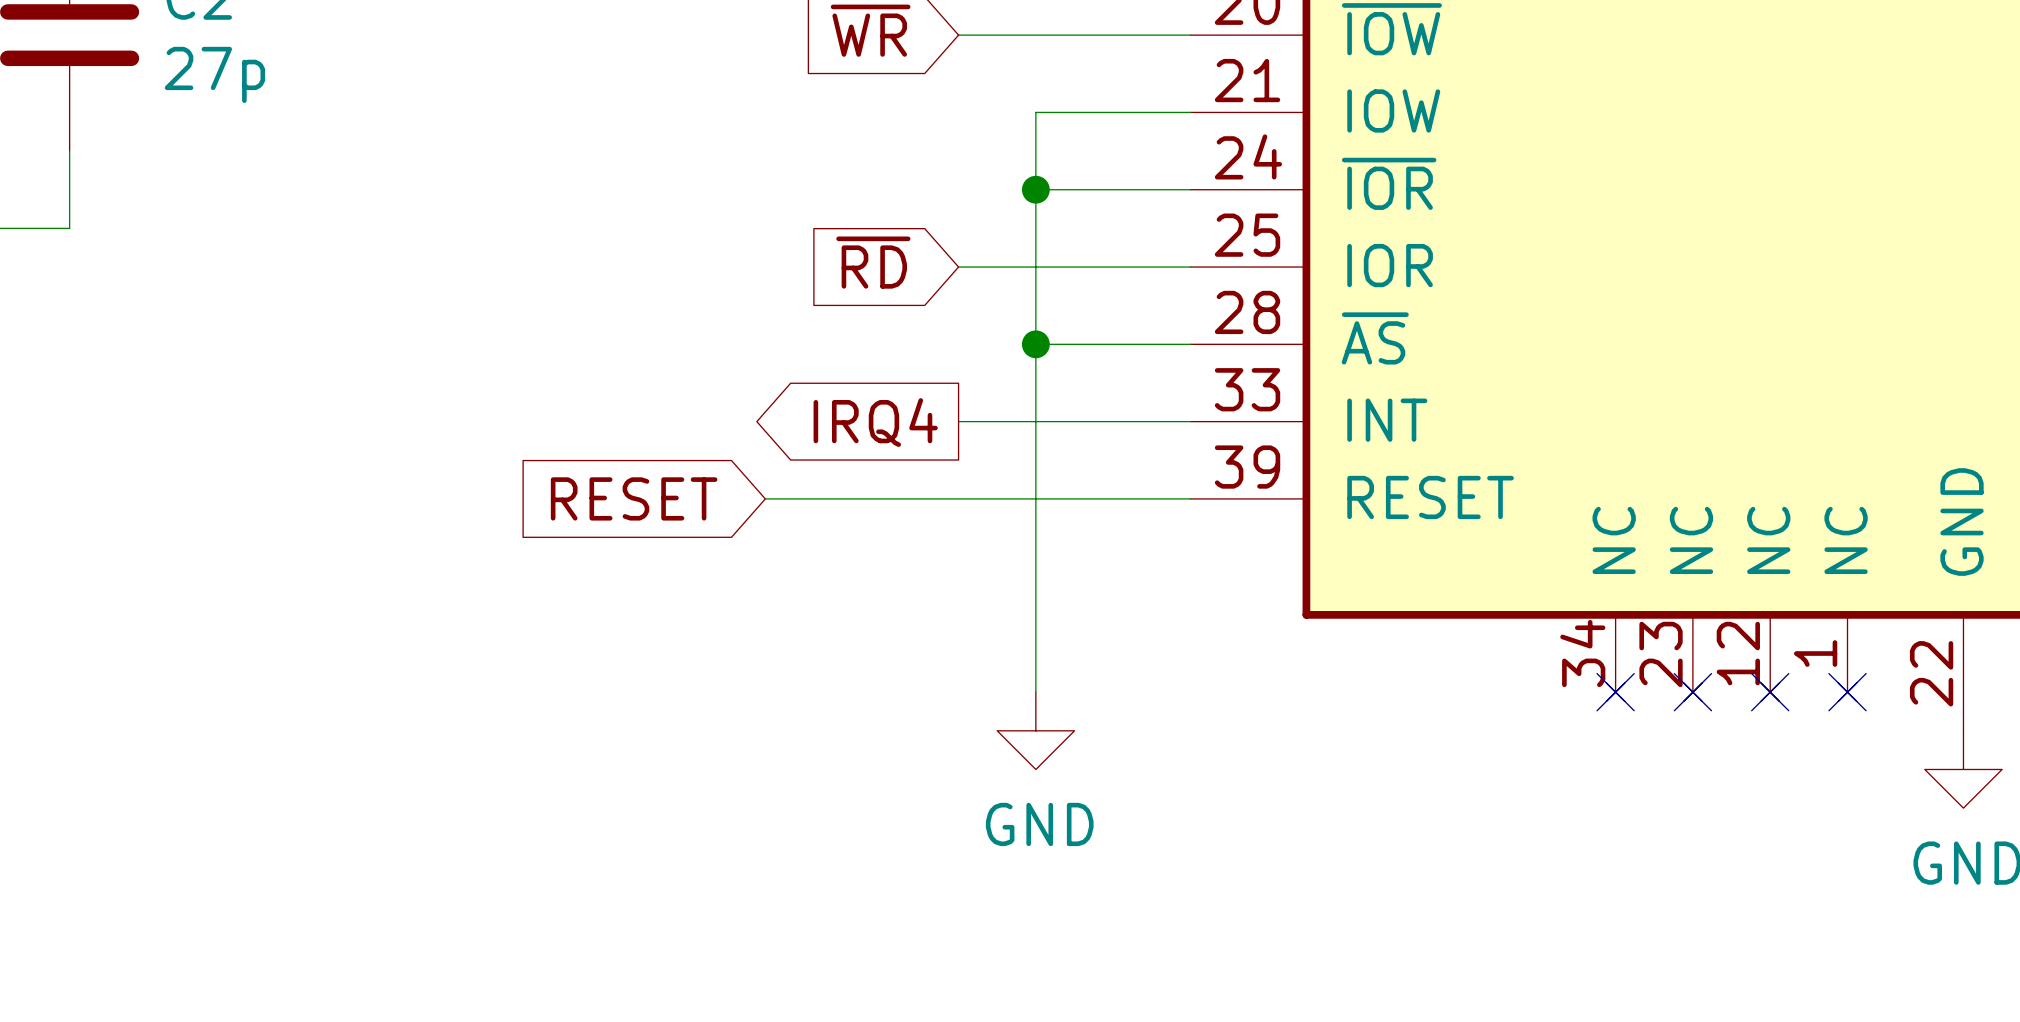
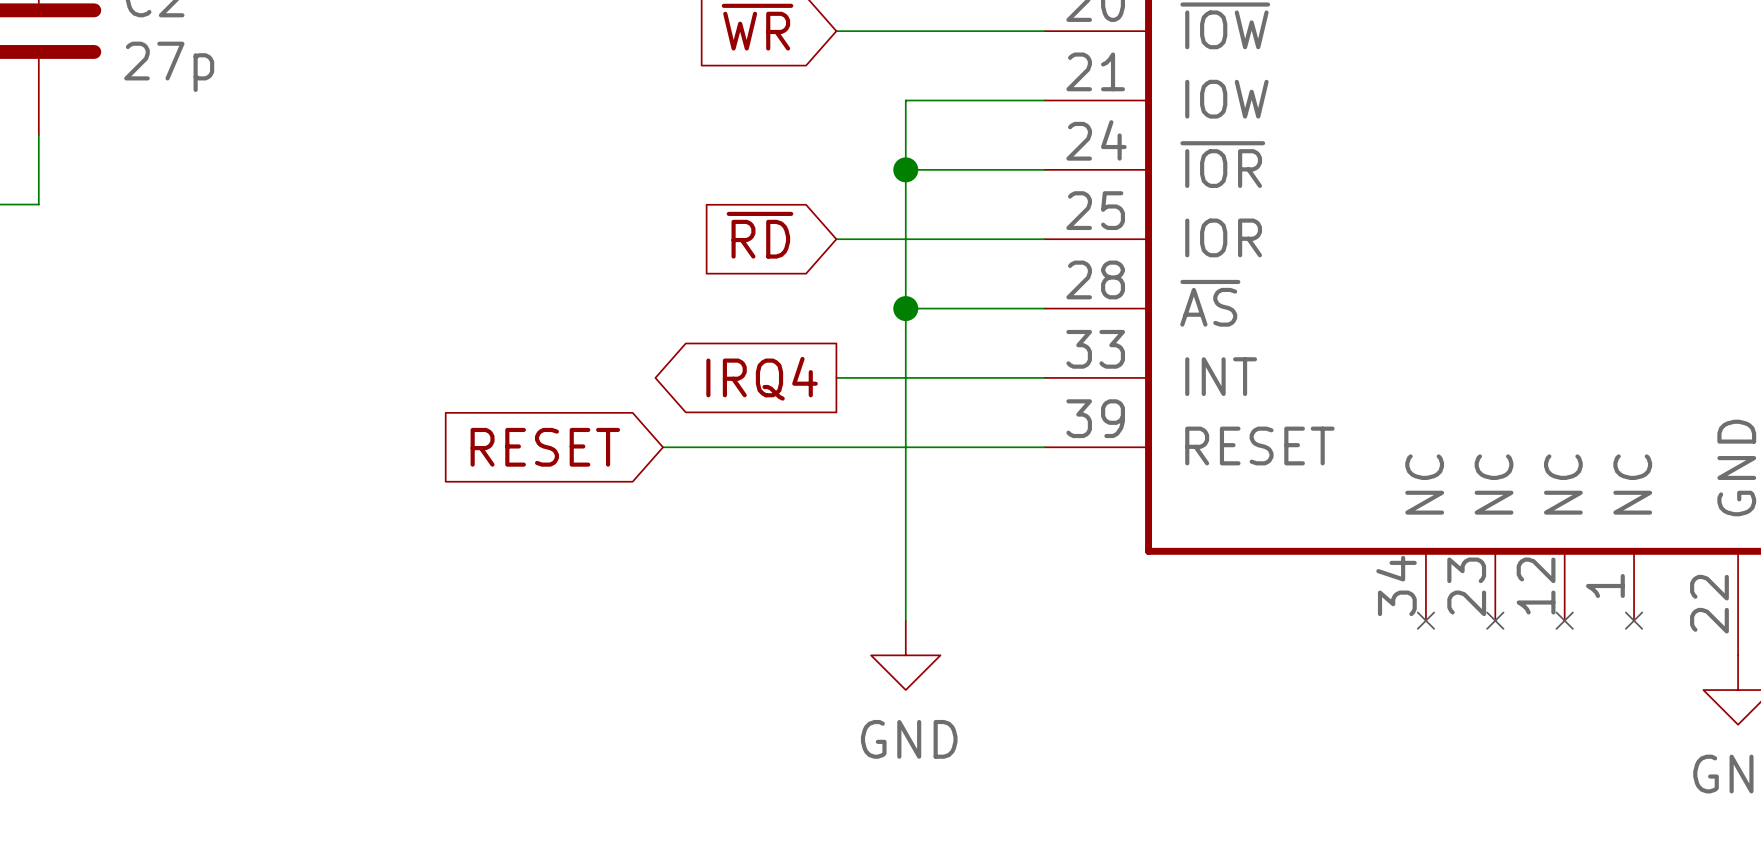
no-connect mark: (1615, 692) -> none
no-connect mark: (1692, 692) -> none
no-connect mark: (1770, 692) -> none
no-connect mark: (1847, 692) -> none

